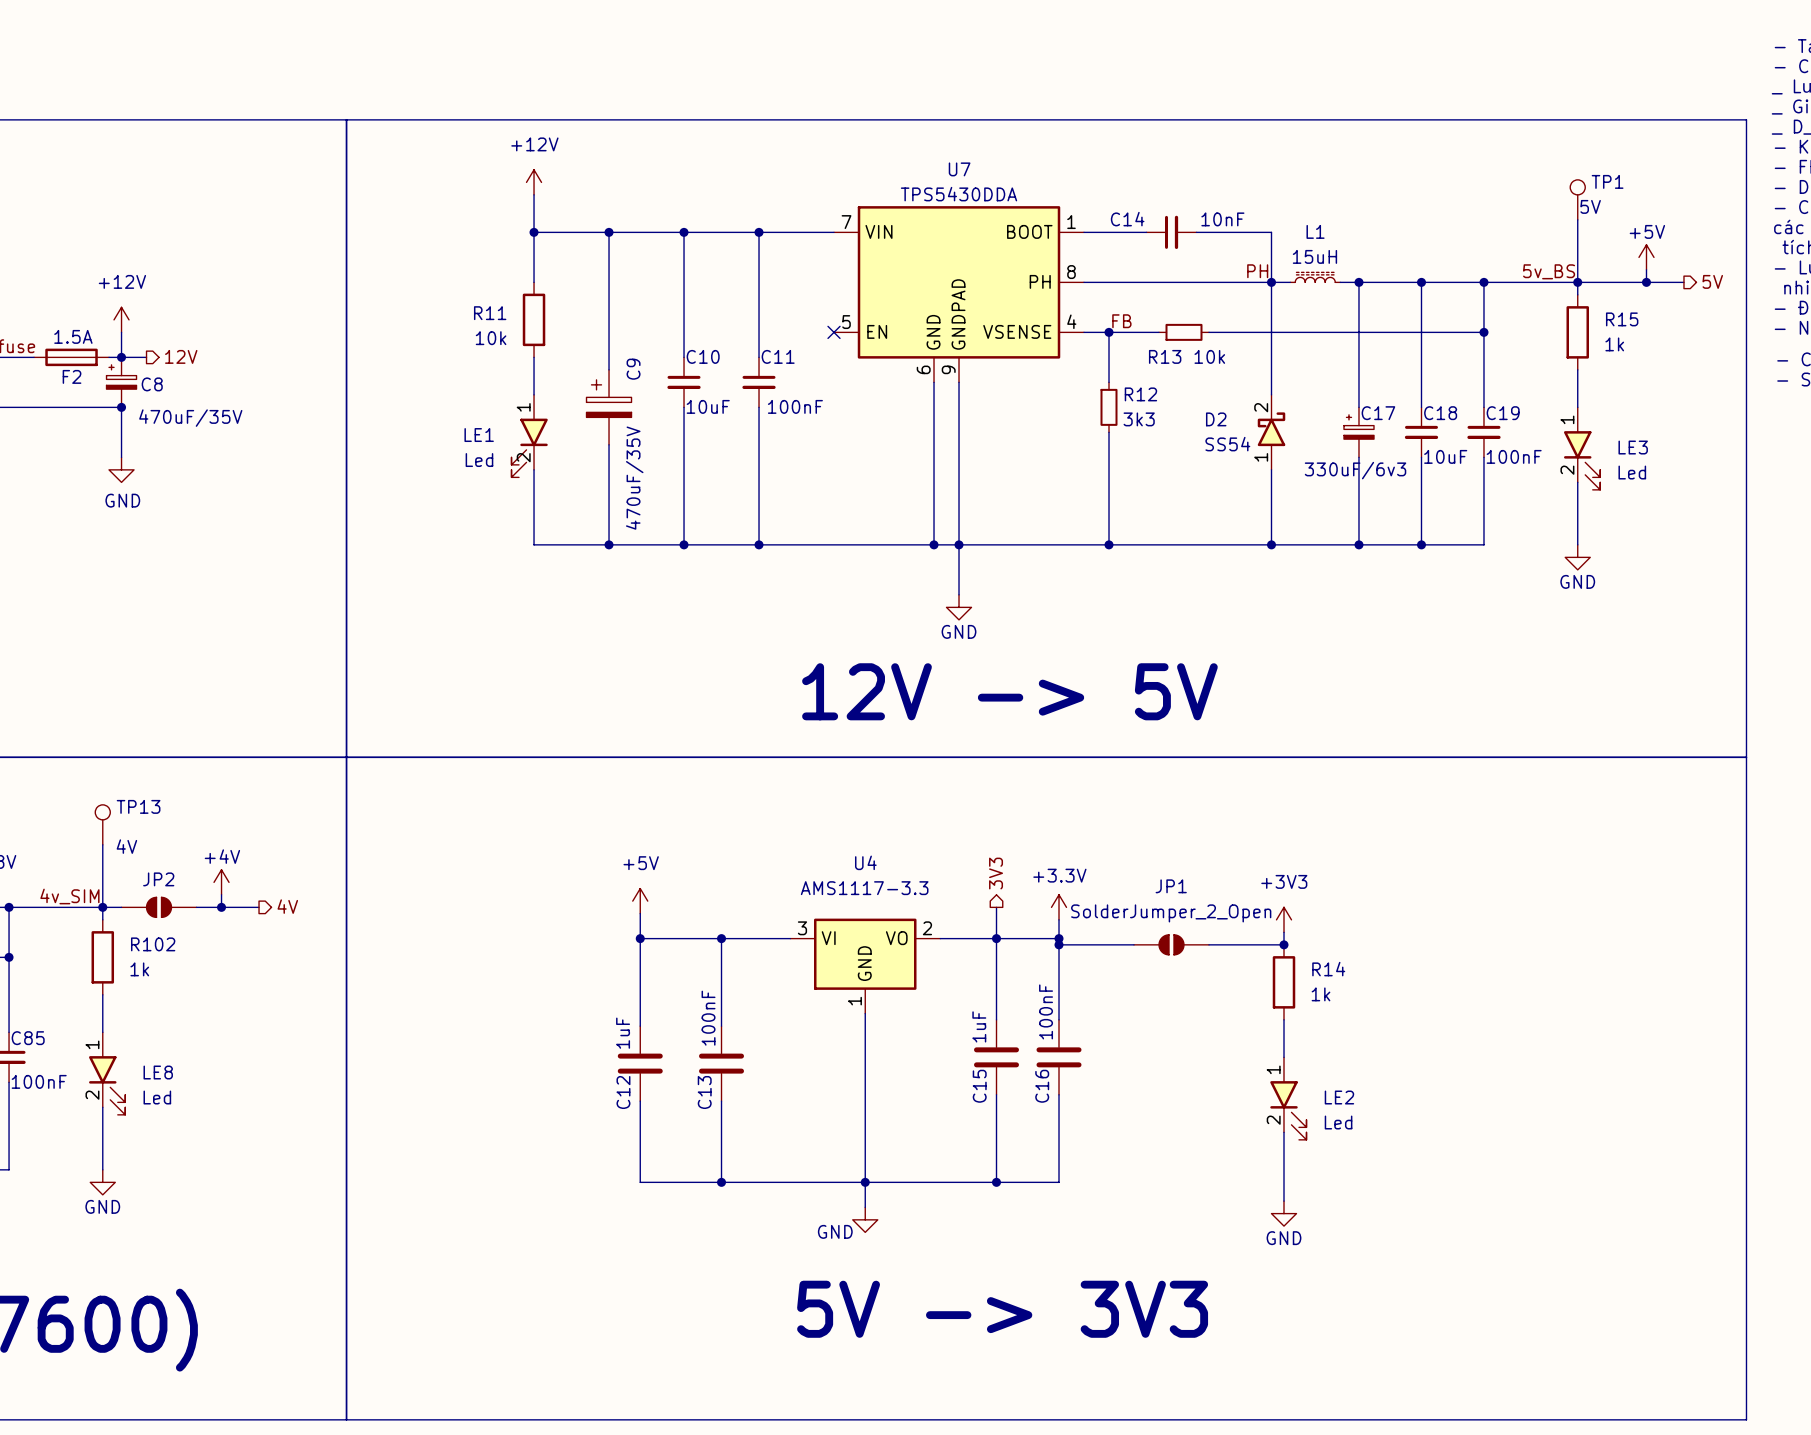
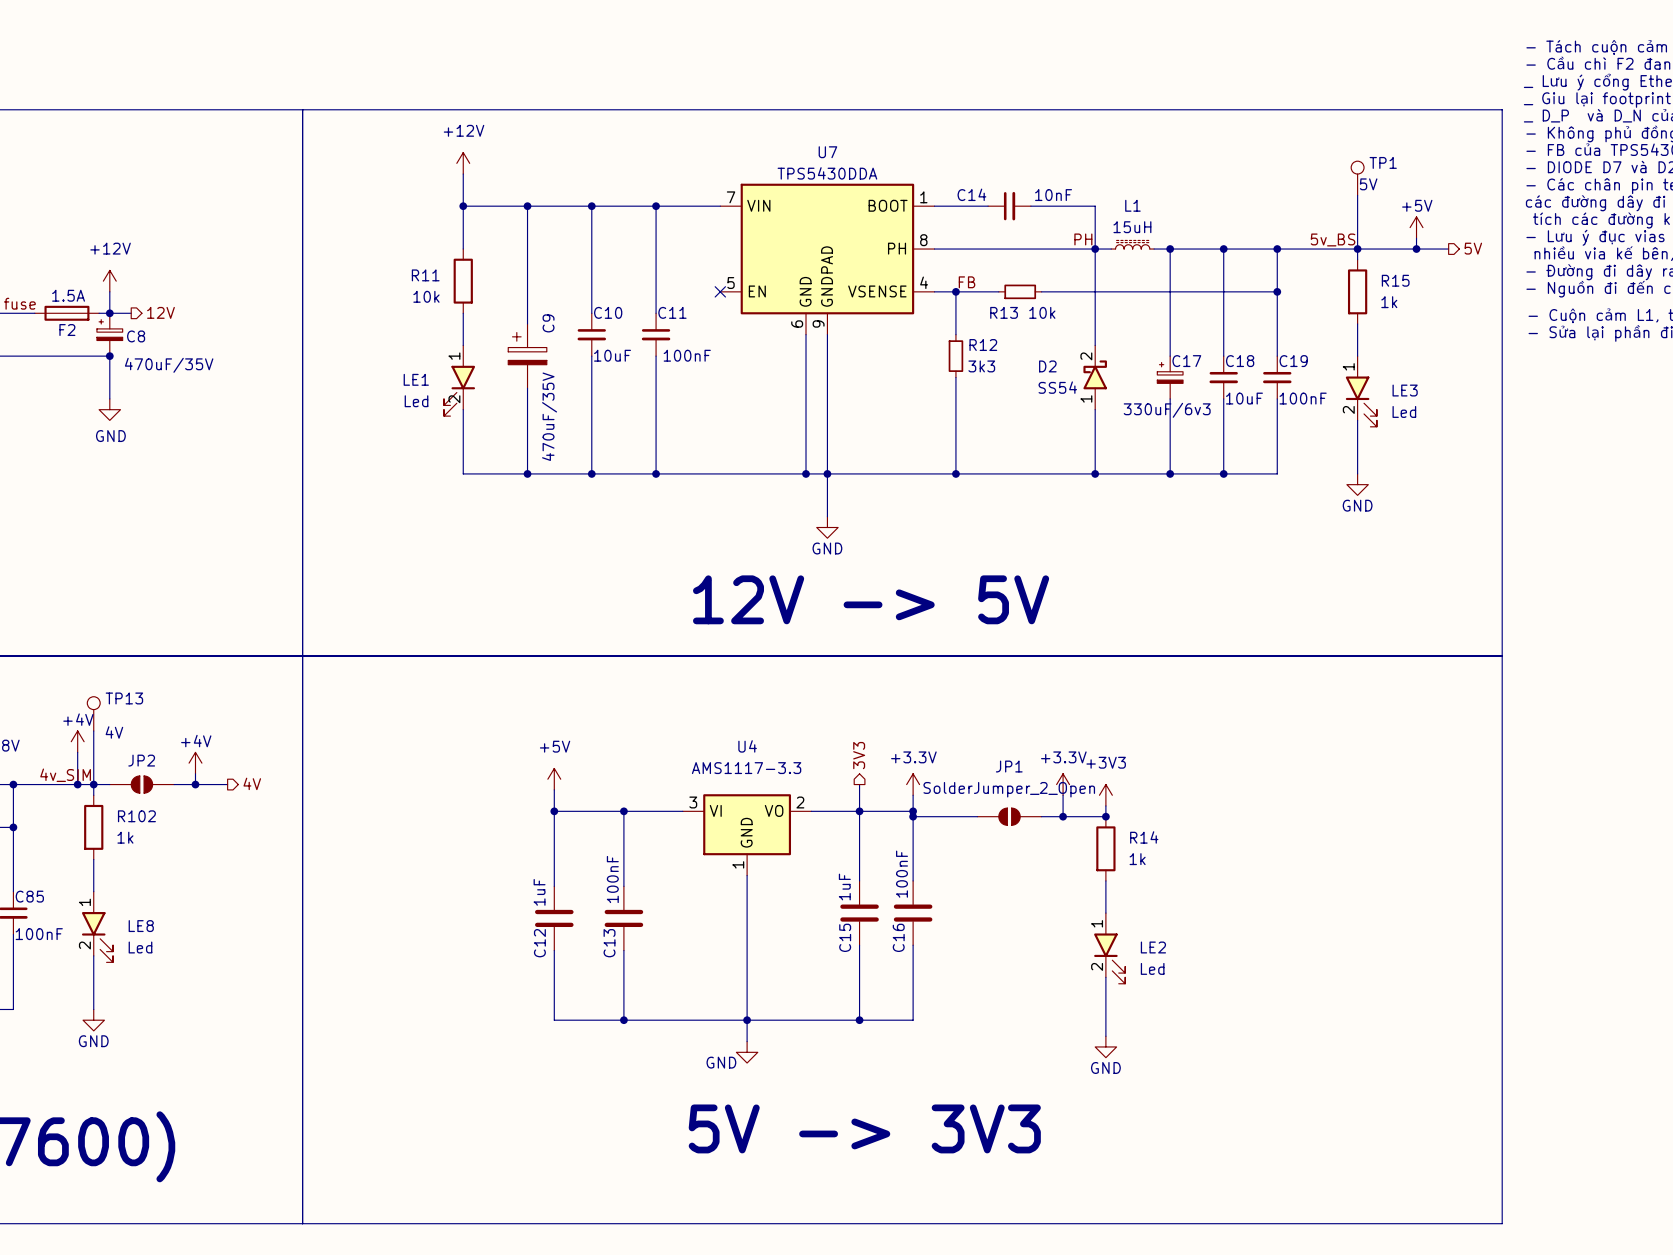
power symbol: none -> +4V (77, 741)
wire: none -> (77, 752) (77, 784)
junction: none -> (77, 784)
power symbol: none -> +3.3V (1063, 784)
wire: none -> (1063, 795) (1063, 816)
junction: none -> (1063, 816)

